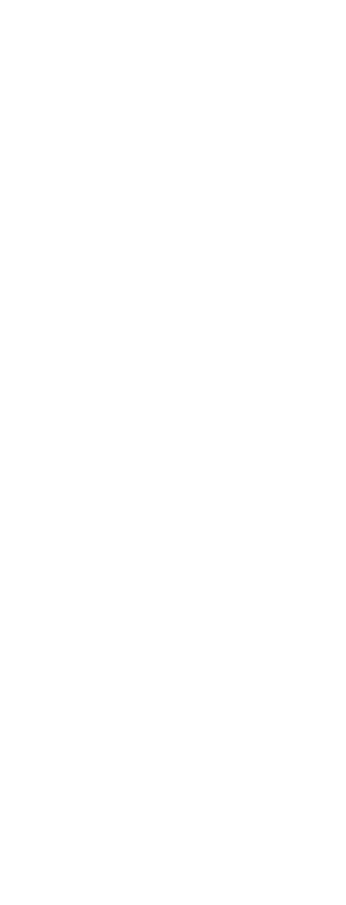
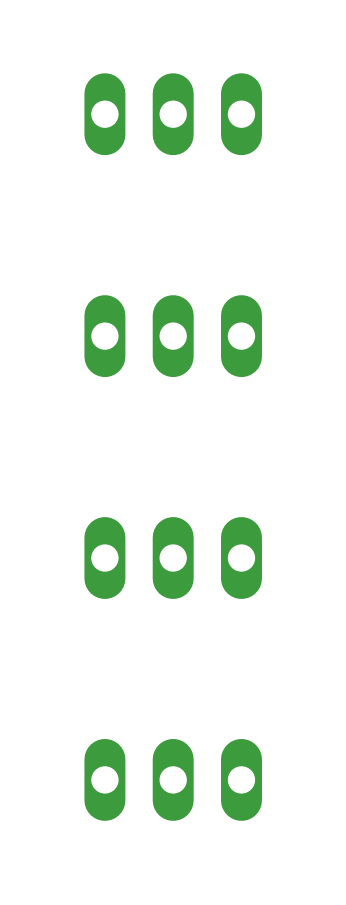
part: none -> (173, 114)
part: none -> (173, 336)
part: none -> (173, 558)
part: none -> (173, 779)

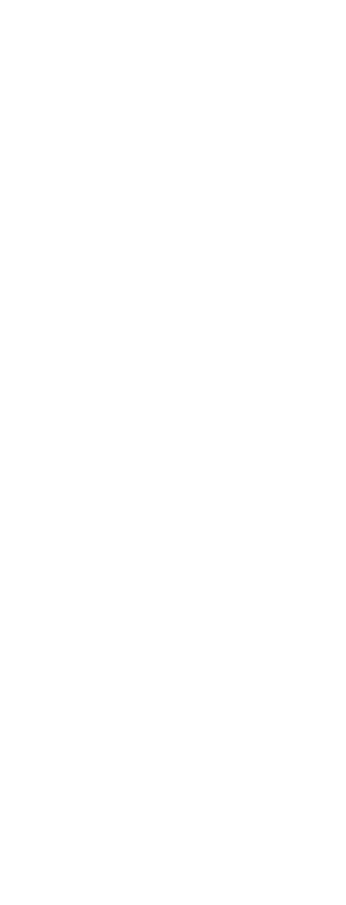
part: (173, 114) -> none
part: (173, 336) -> none
part: (173, 558) -> none
part: (173, 779) -> none

